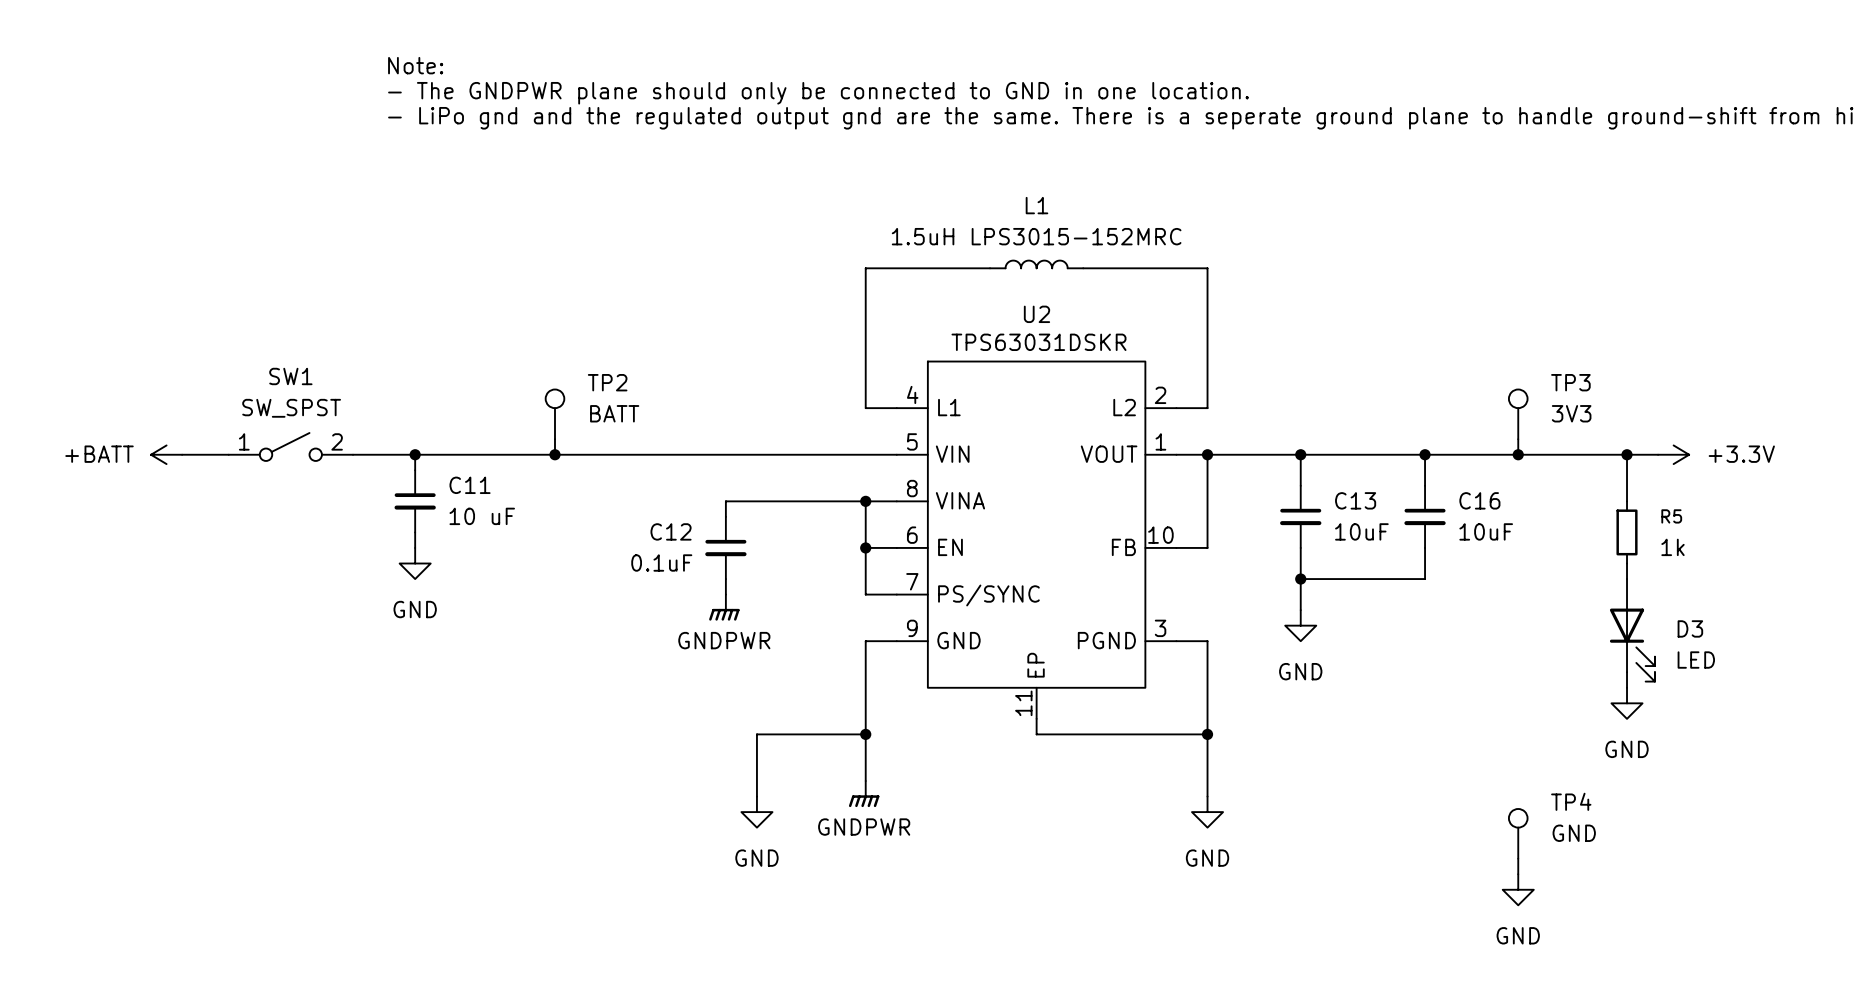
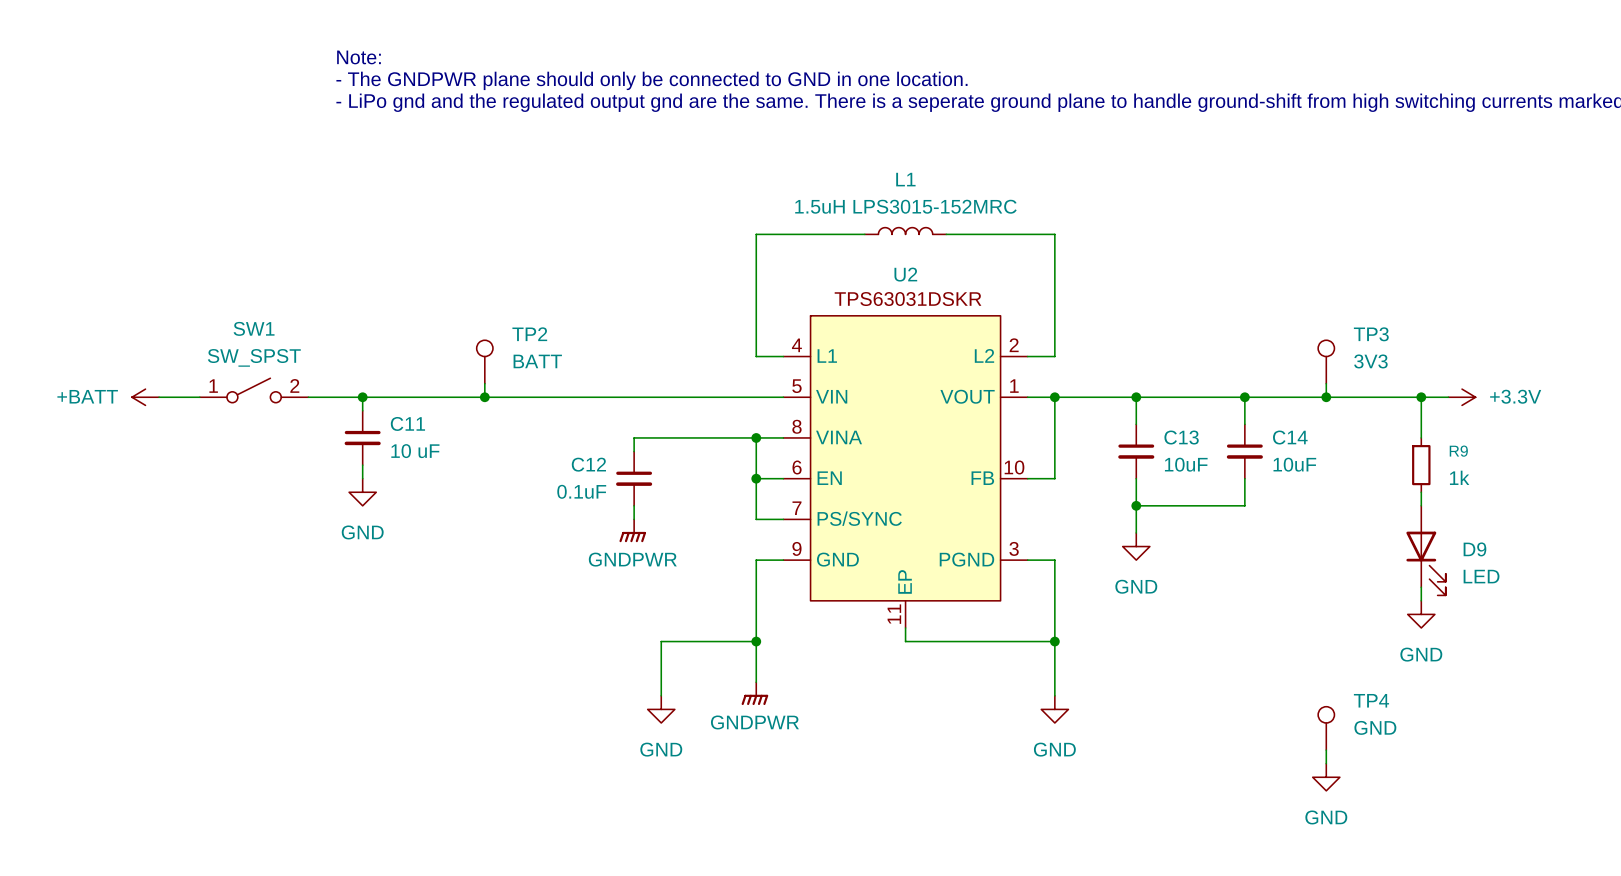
C16 name: C16 (1479, 500) -> C14 (1290, 437)
R5 name: R5 (1671, 516) -> R9 (1458, 451)
D3 name: D3 (1690, 628) -> D9 (1474, 549)

